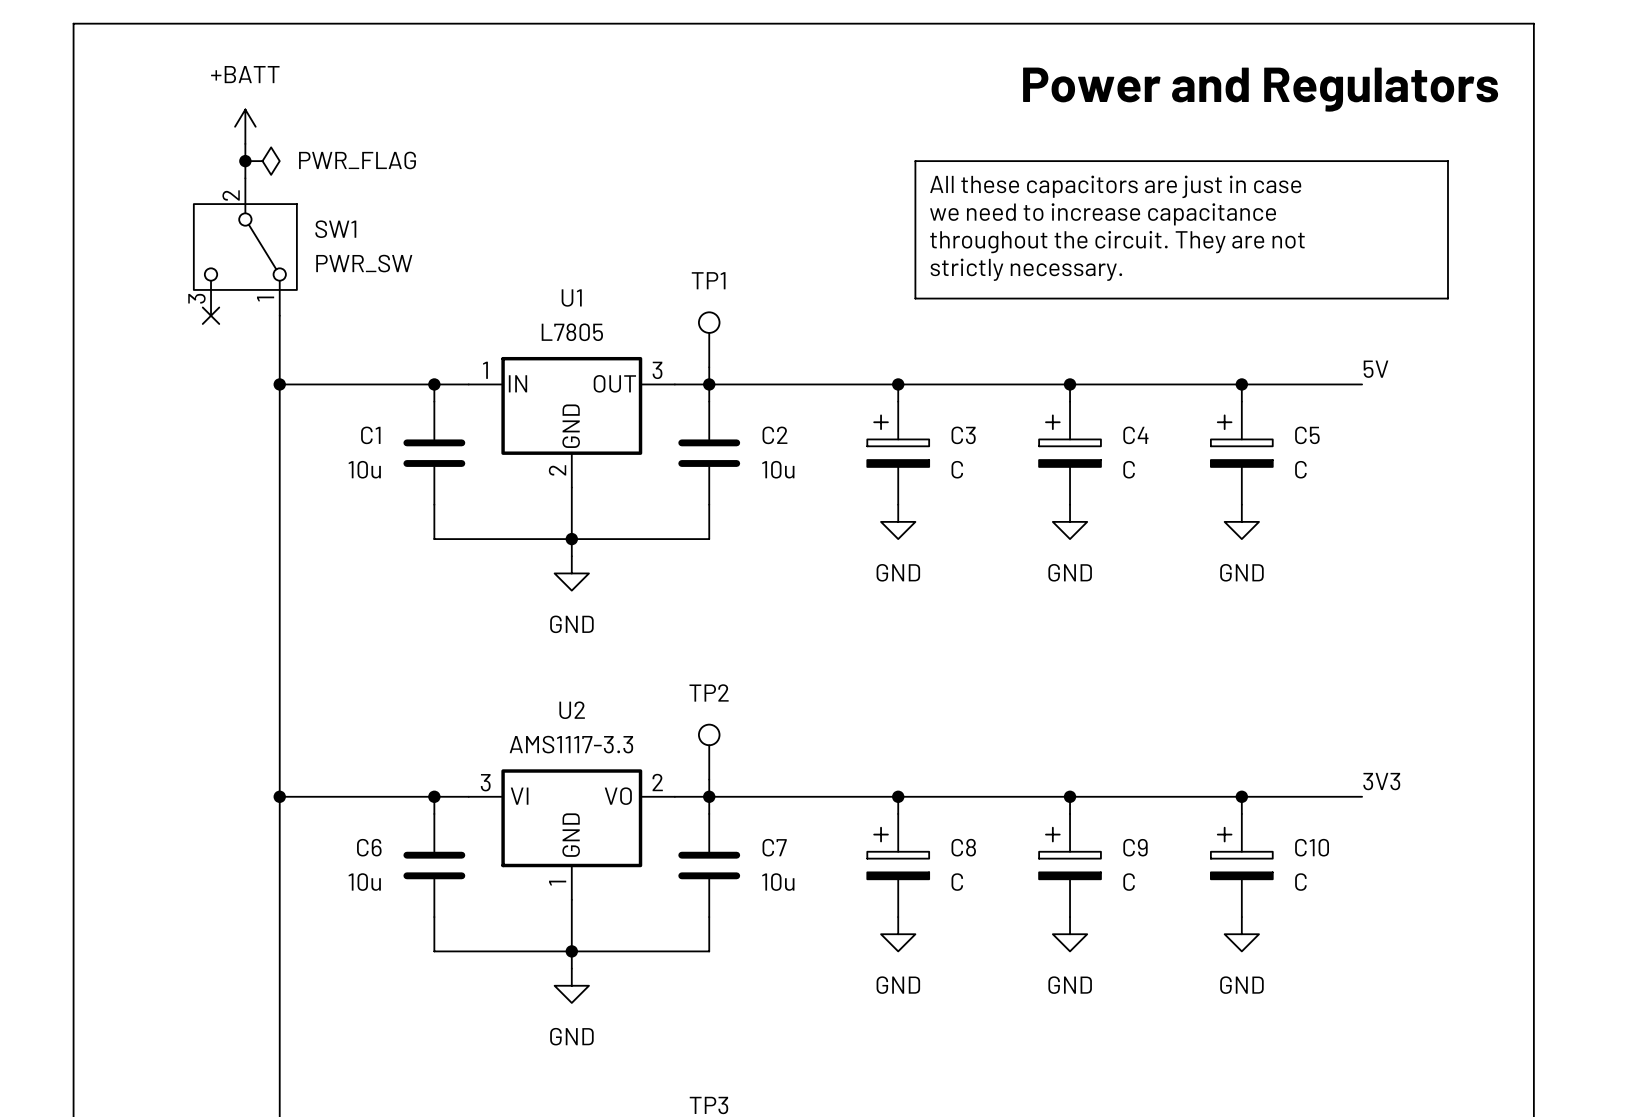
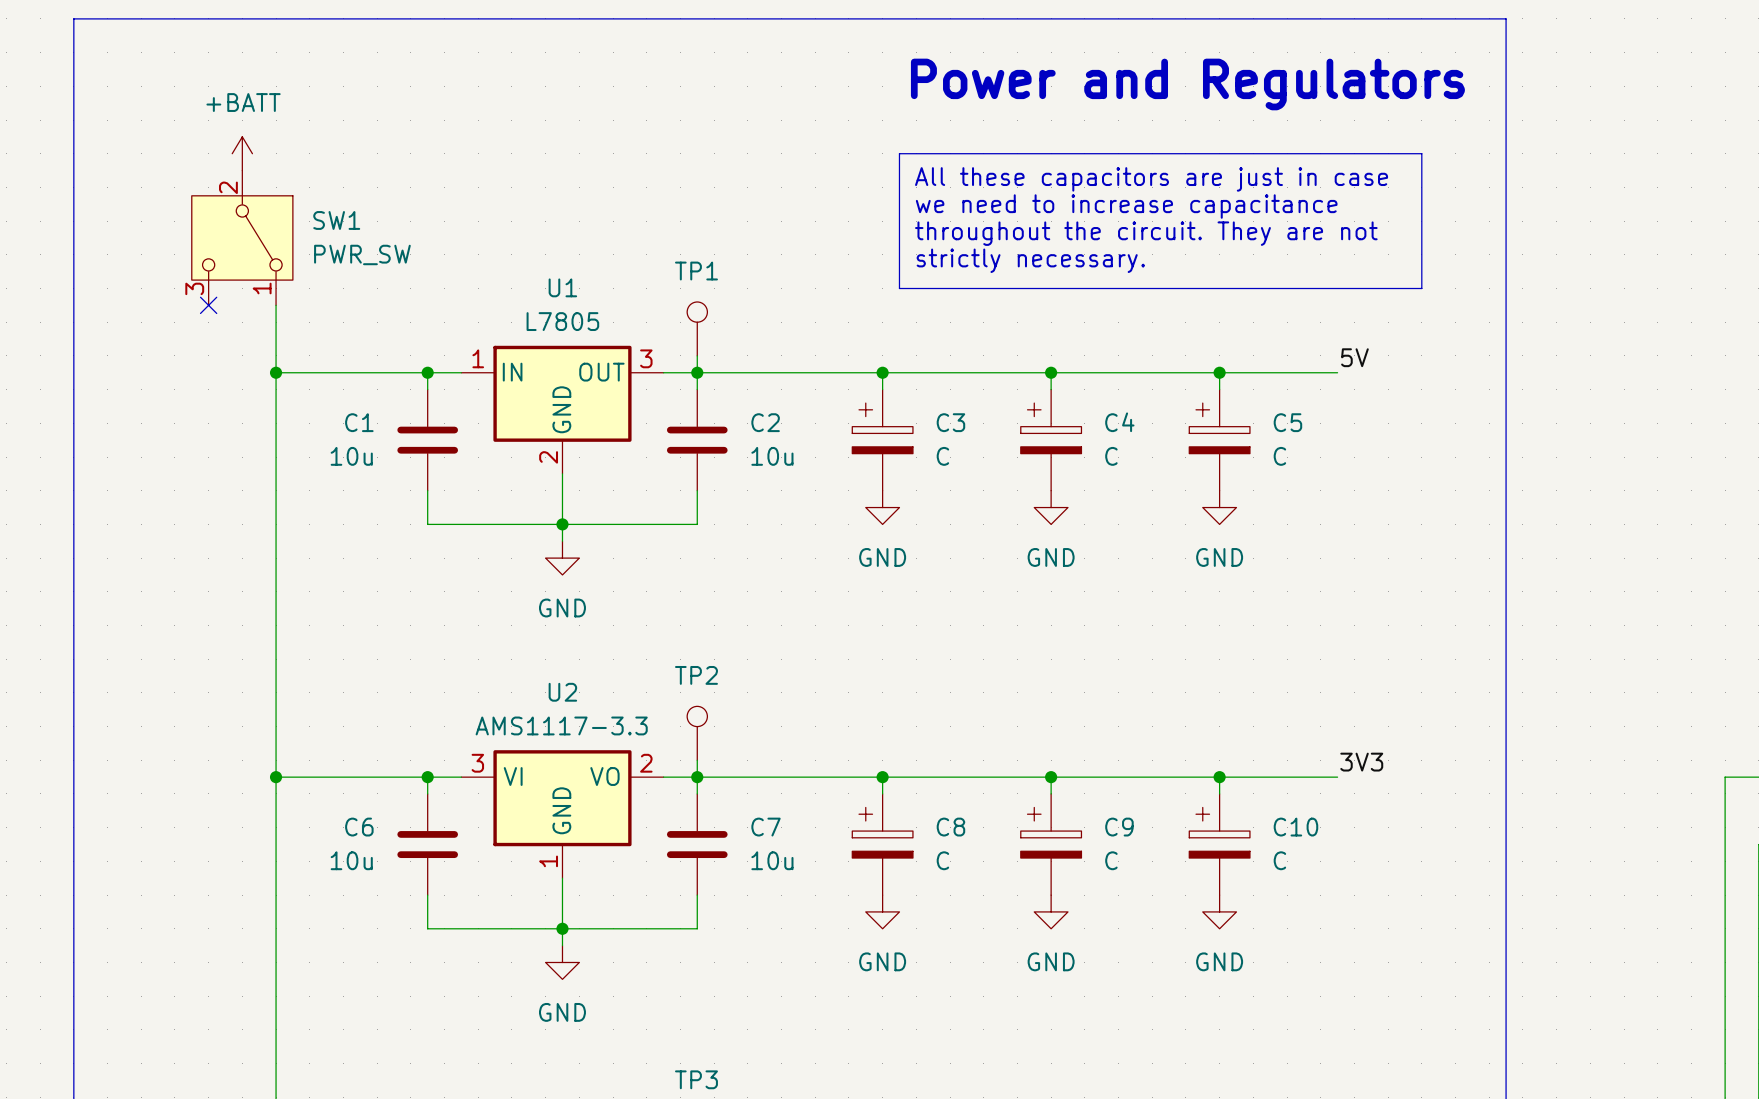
power symbol position: +BATT (245, 126) -> +BATT (242, 153)
junction: (245, 161) -> none
power symbol: PWR_FLAG (262, 161) -> none

